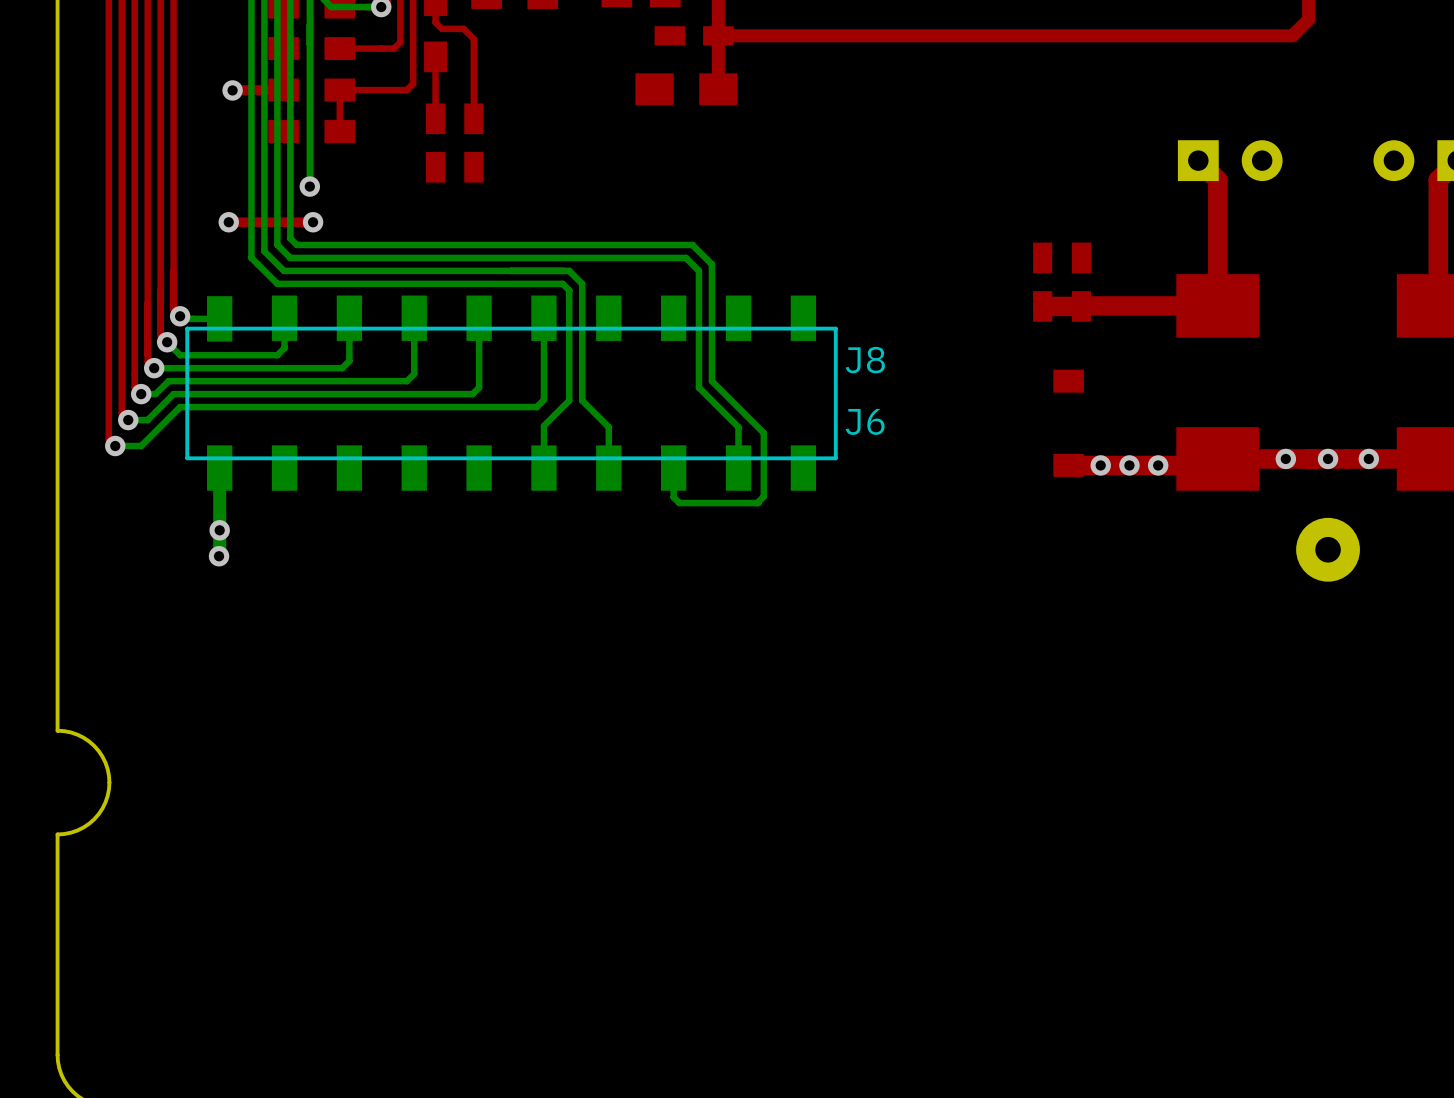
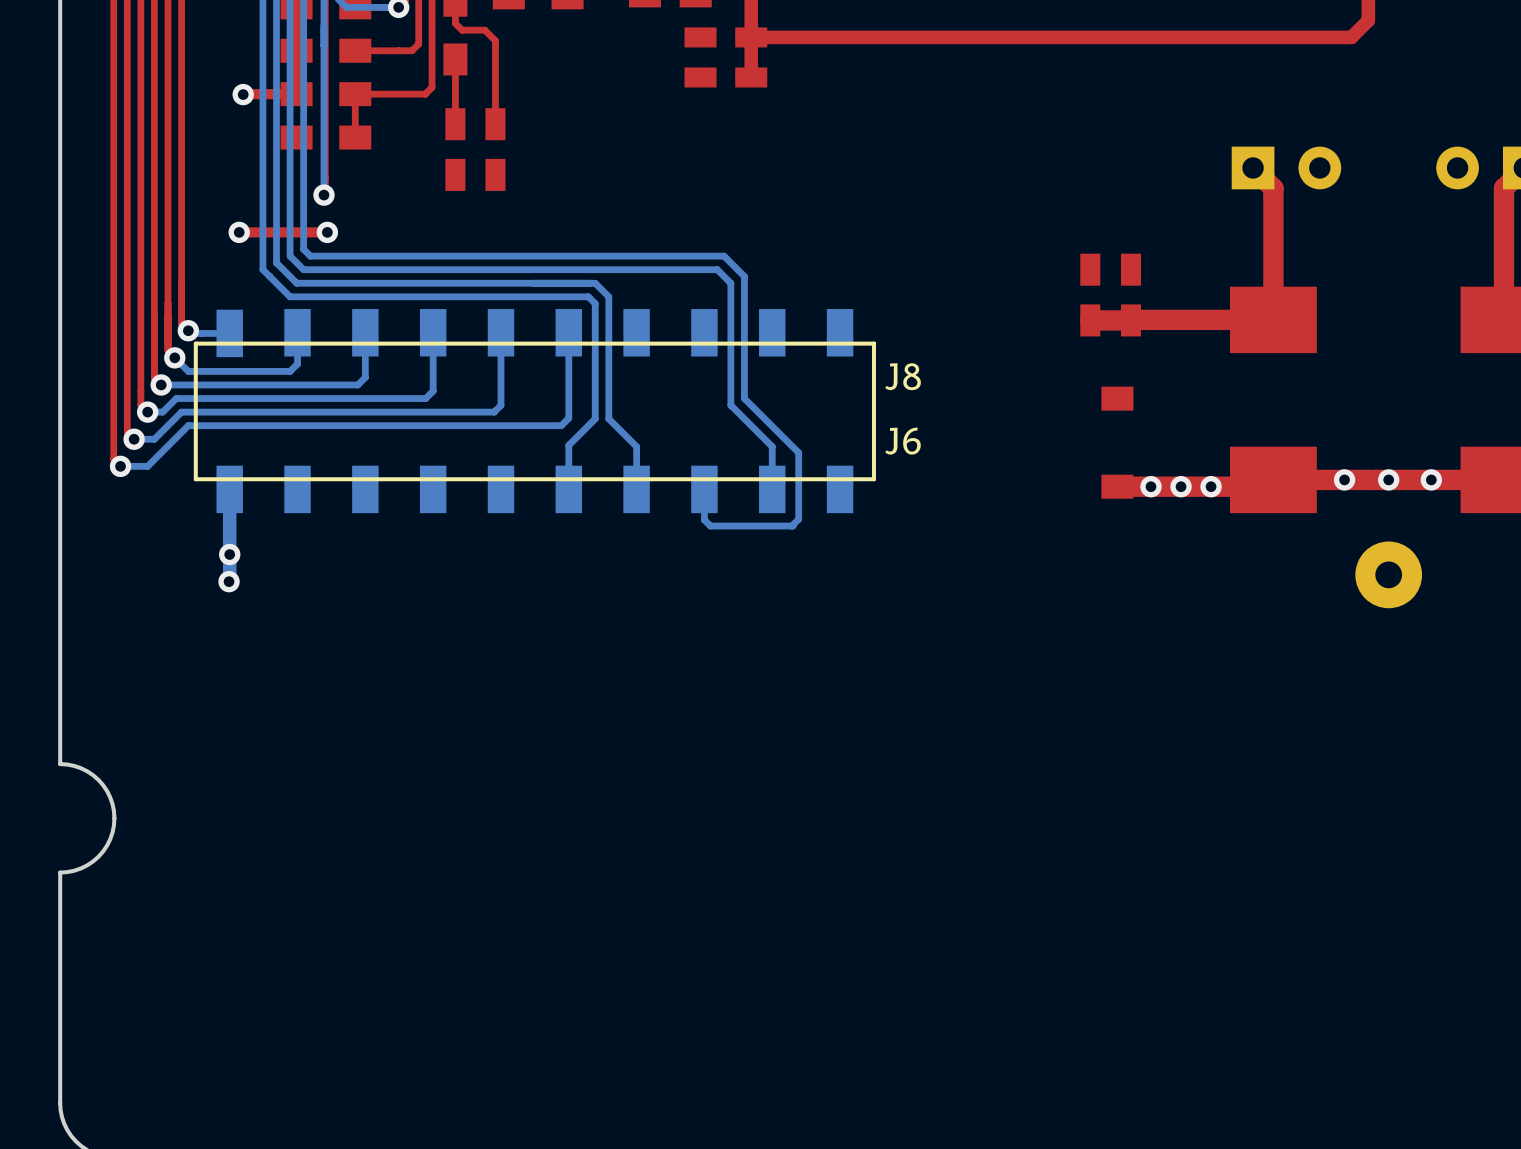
part footprint: [635, 73, 738, 106] -> [684, 67, 768, 88]

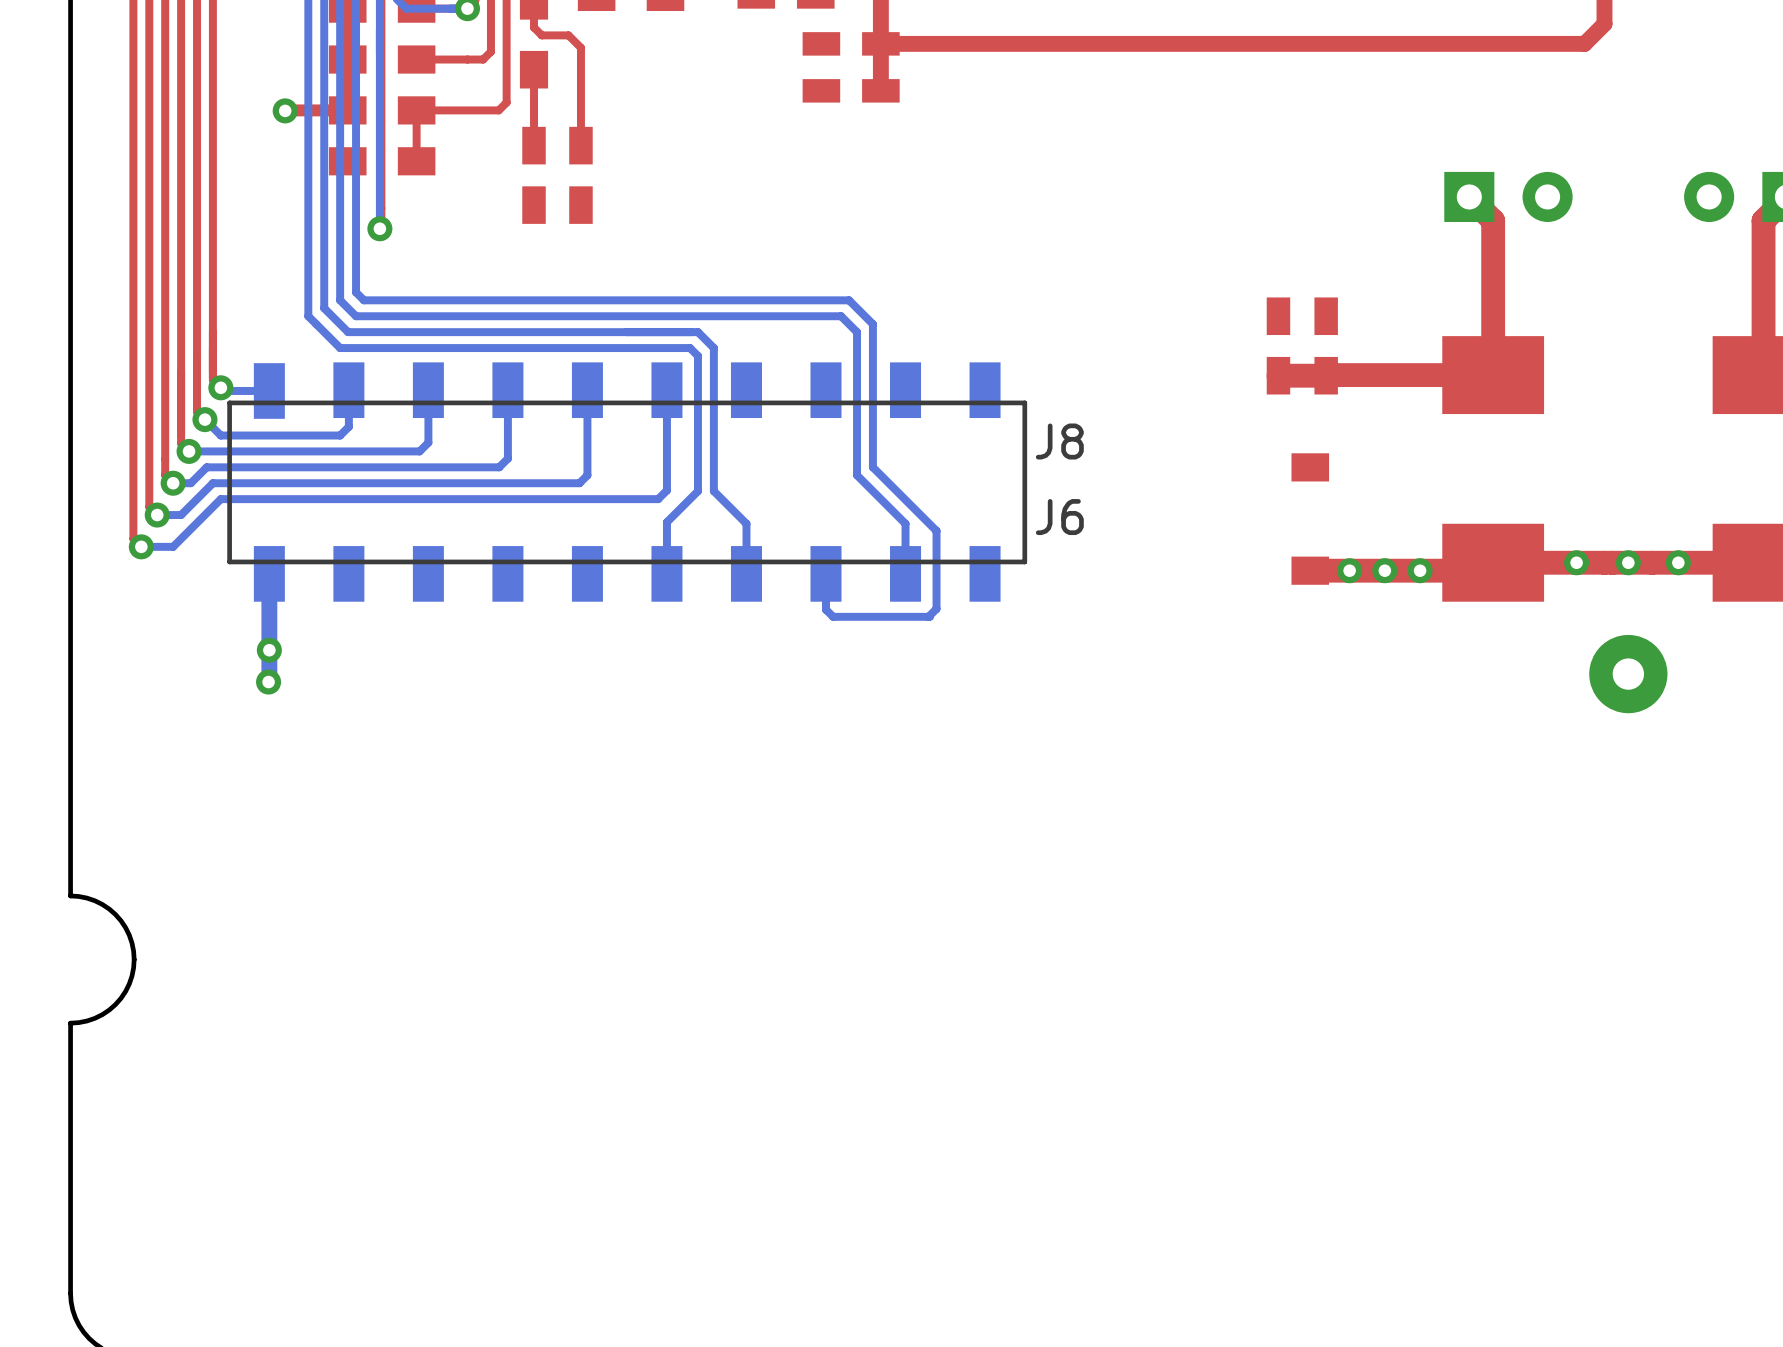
via: (239, 232) -> none
top track: (327, 232) (239, 232) -> none
via: (327, 232) -> none

